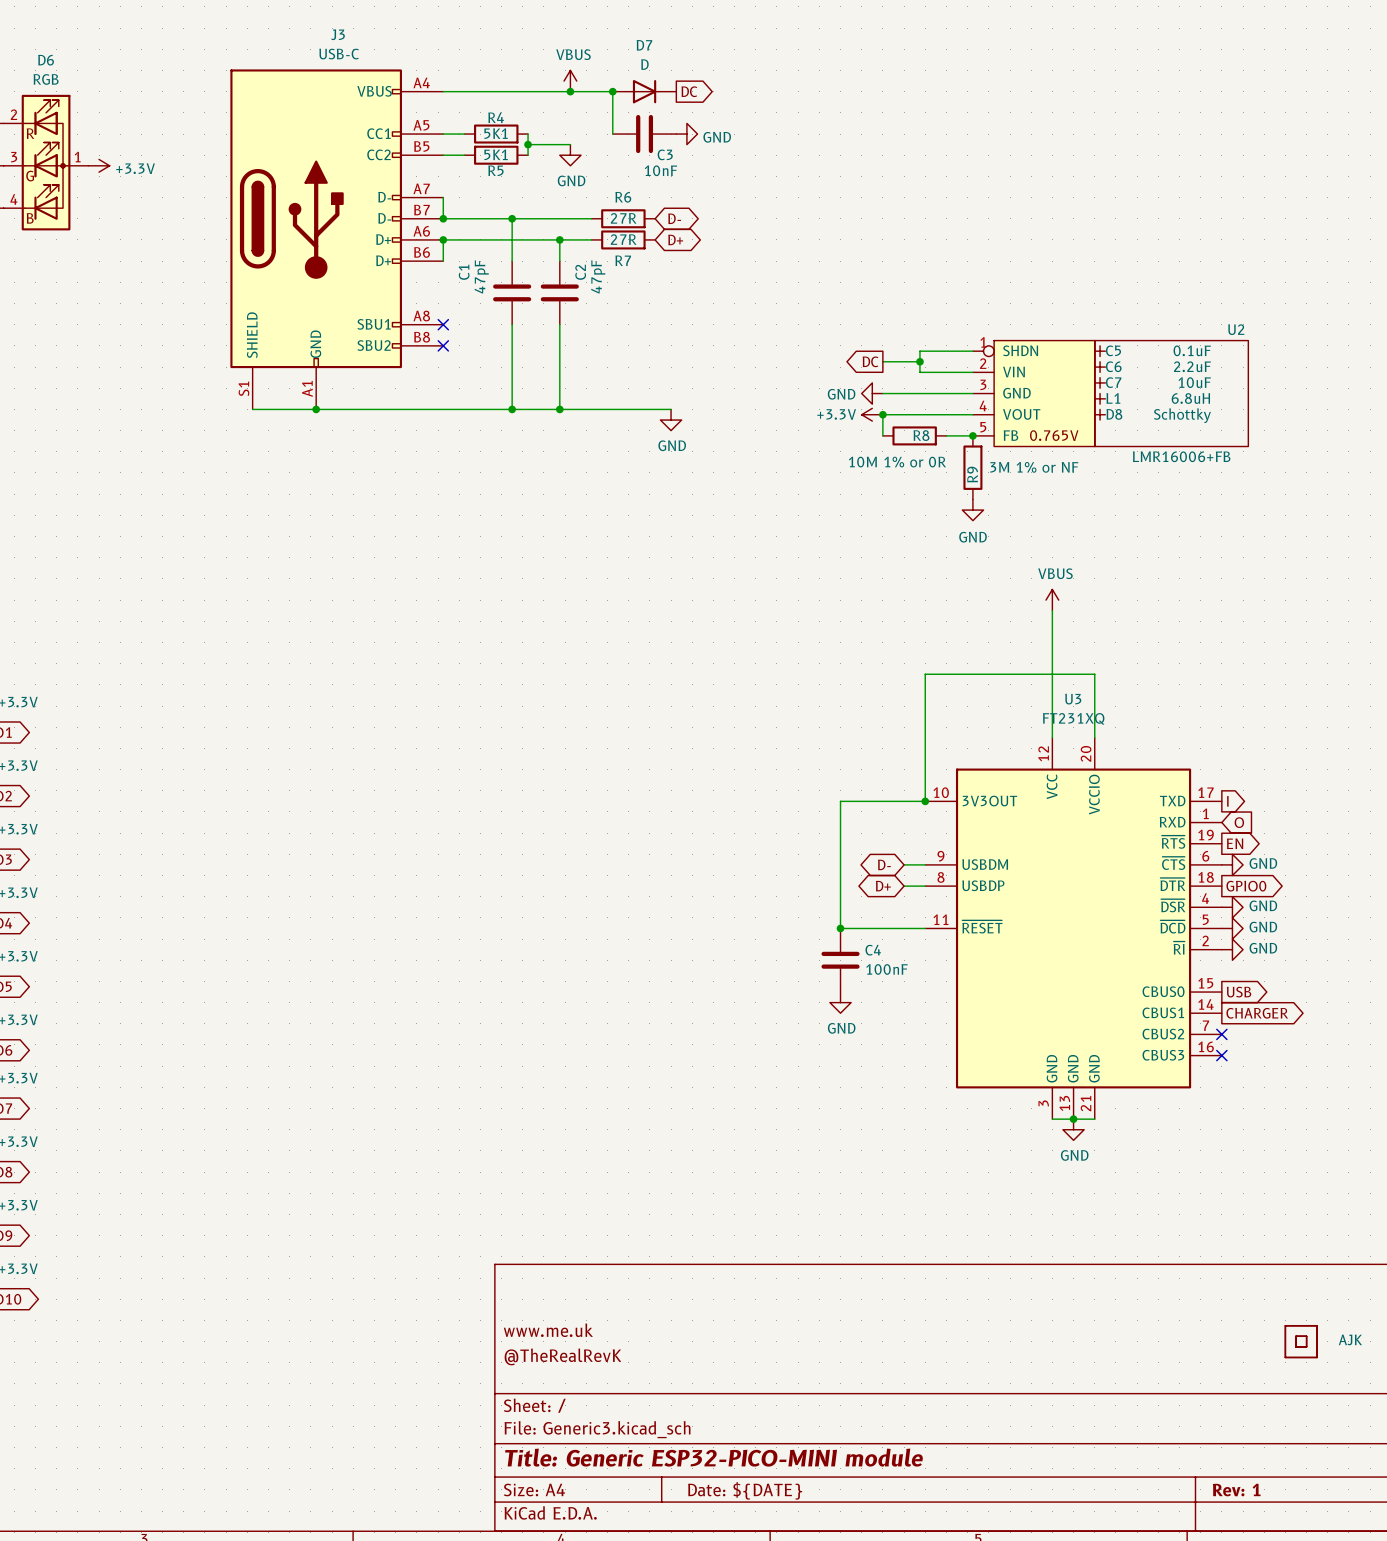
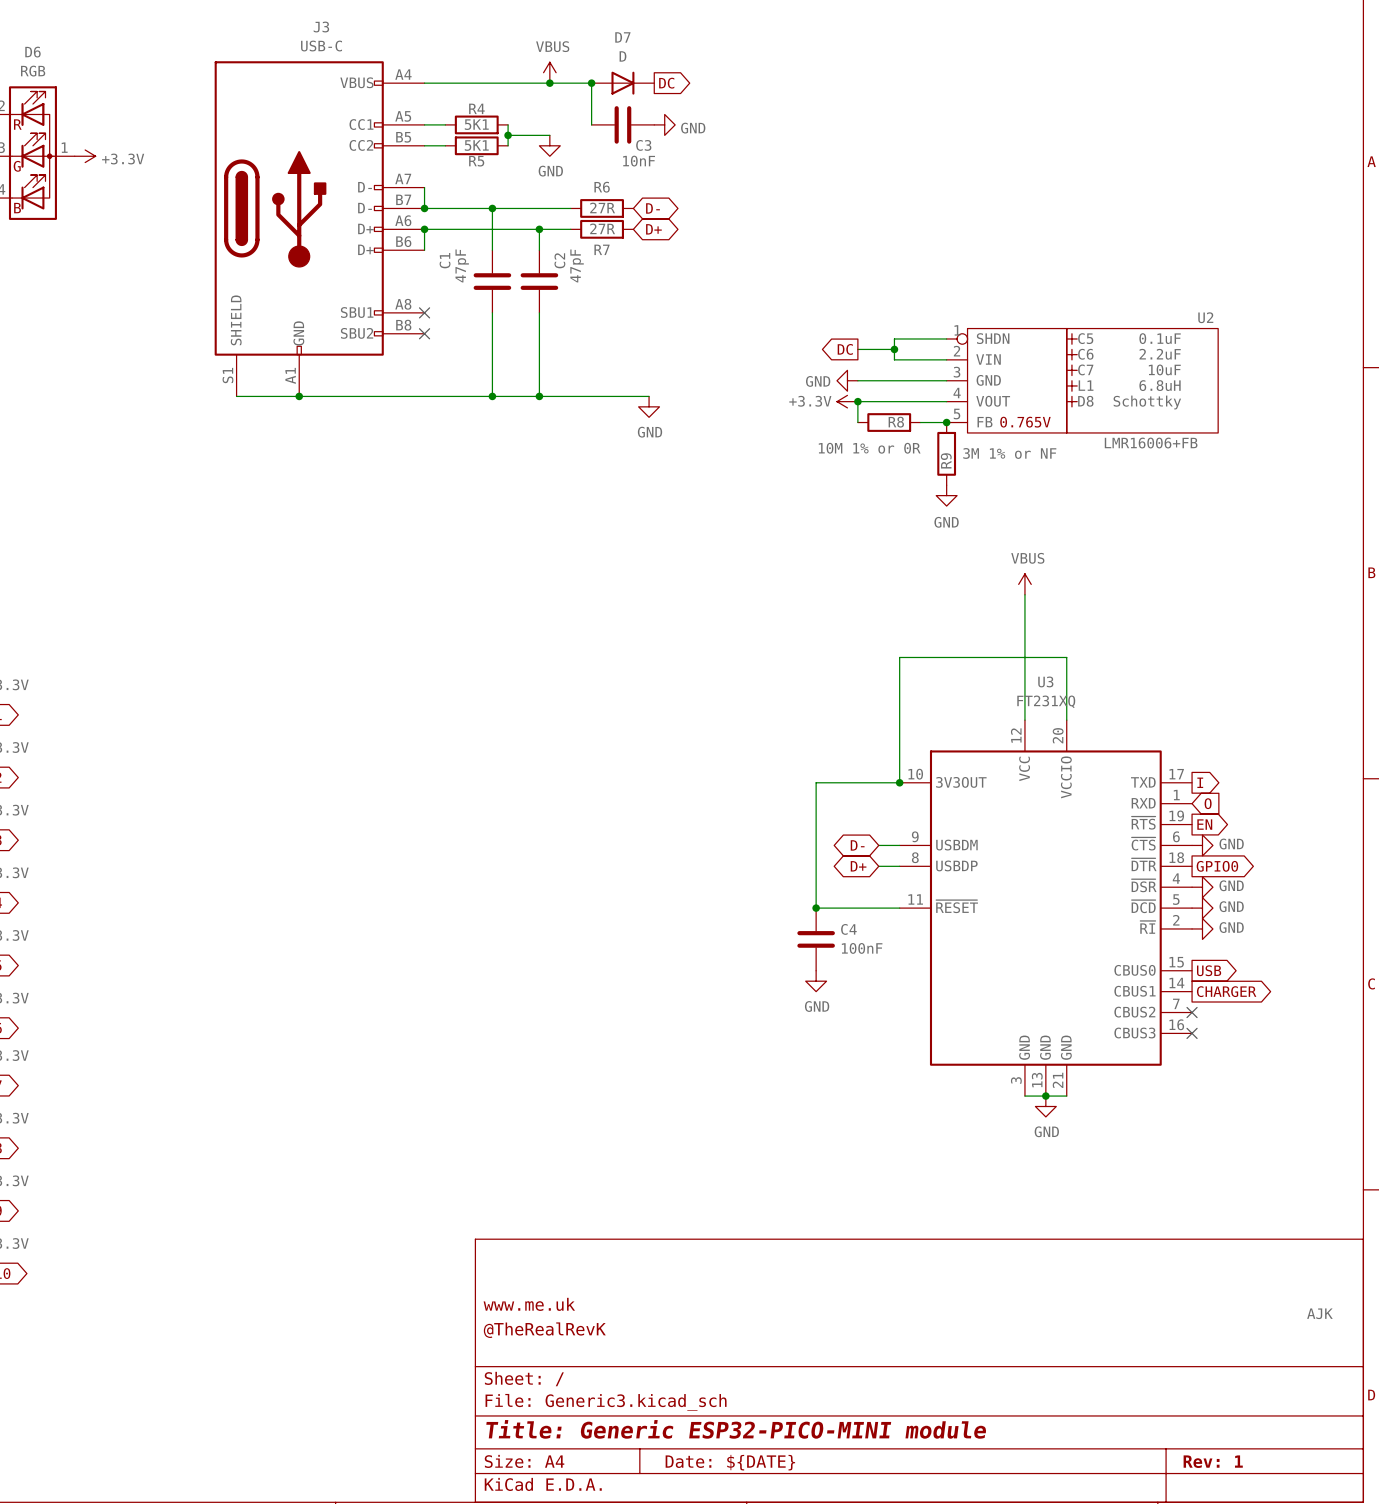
part: (1301, 1341) -> none

